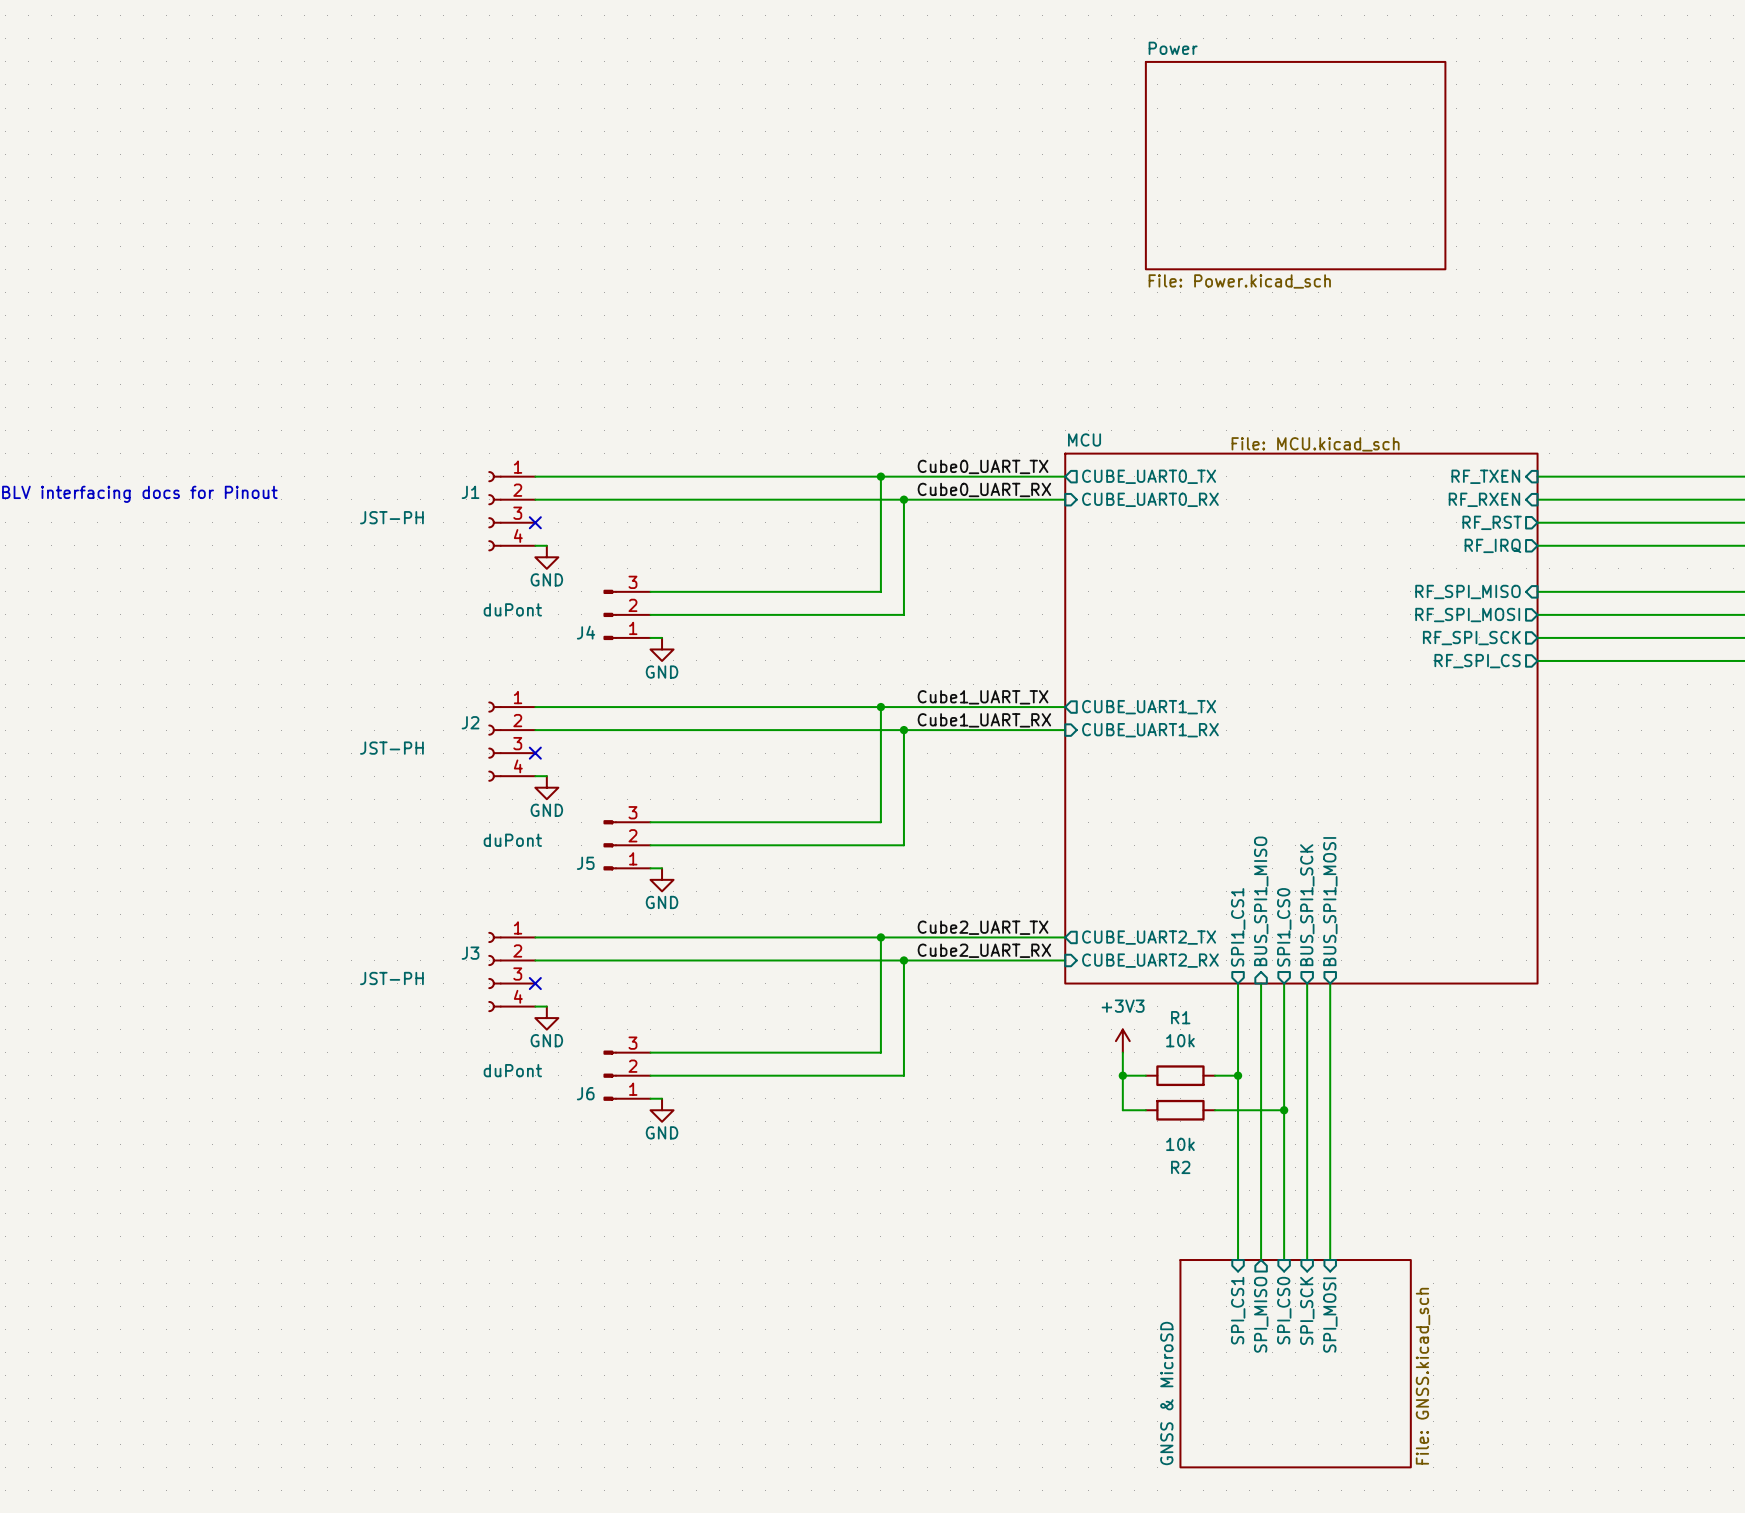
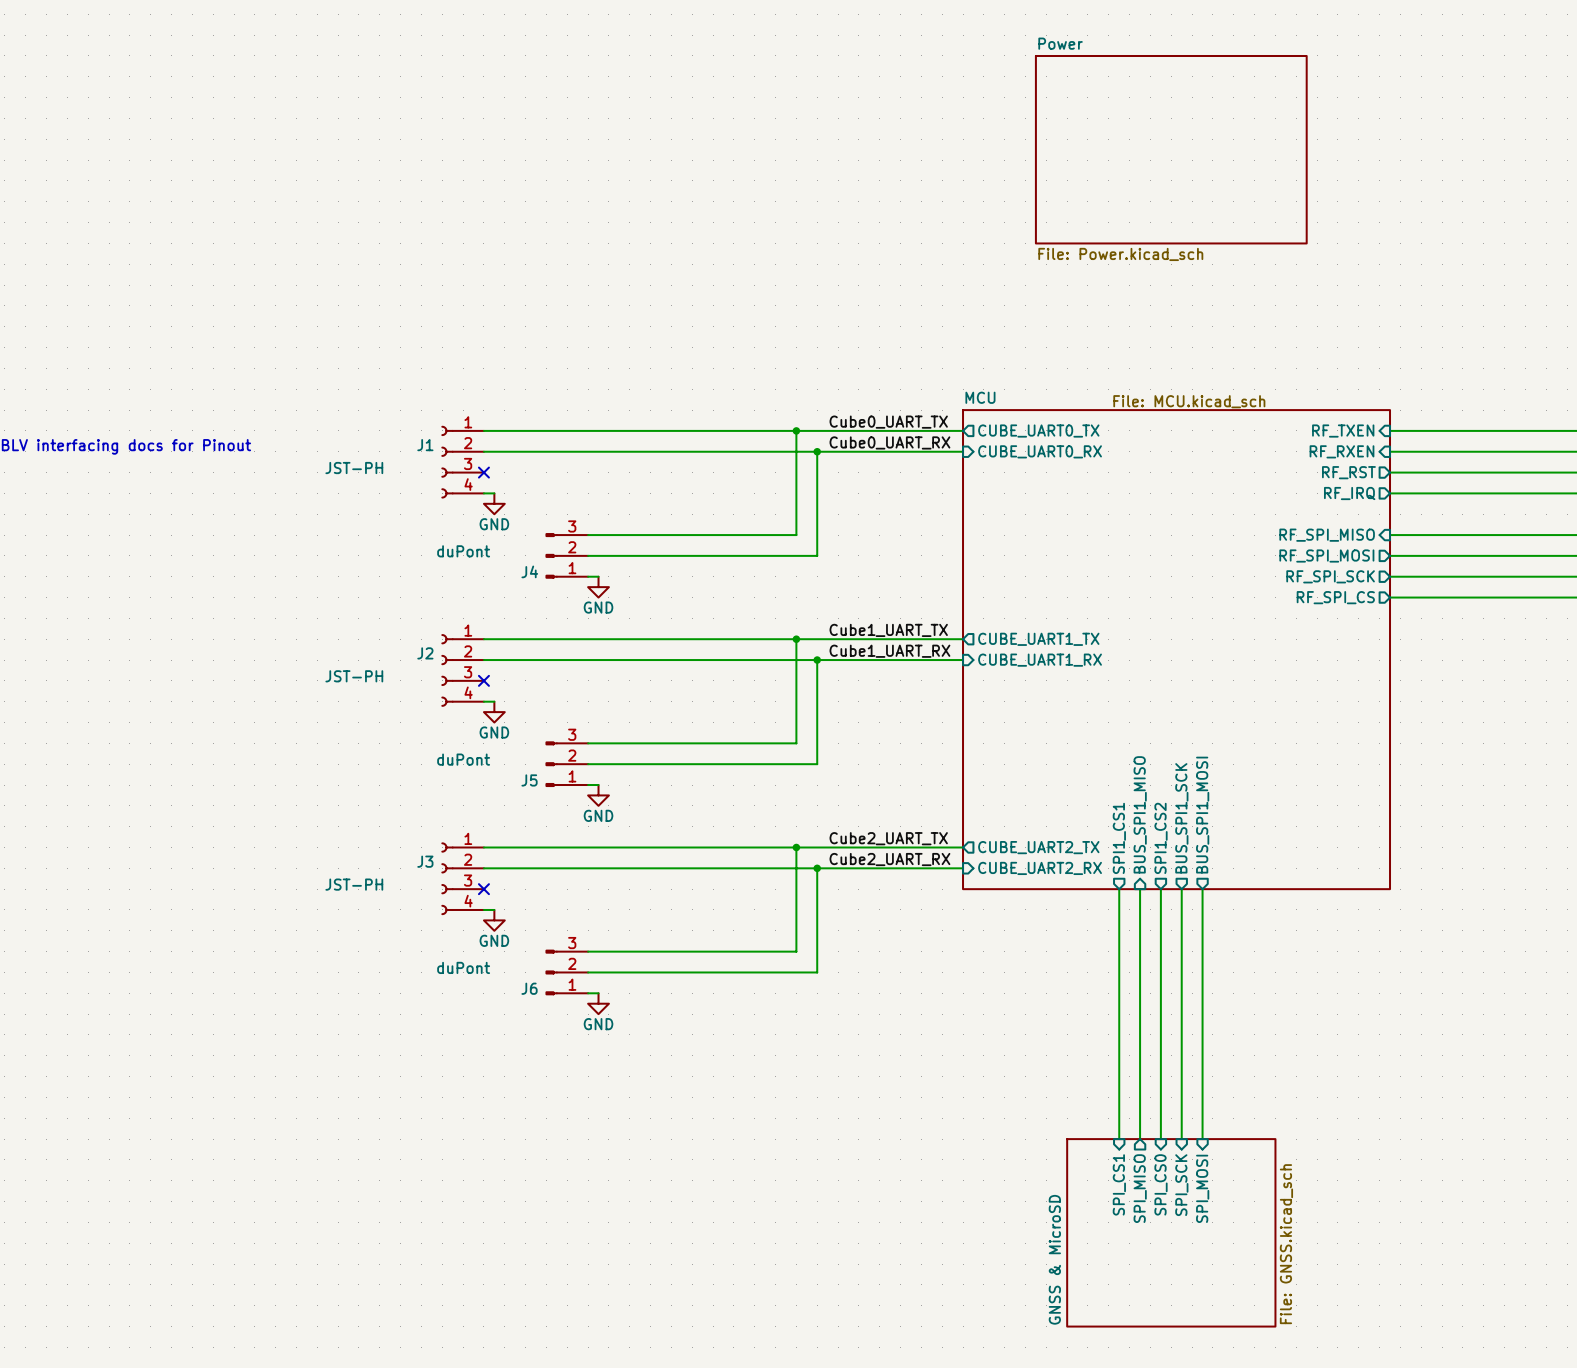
sheet pin: SPI1_CS0 (1284, 927) -> SPI1_CS2 (1161, 838)
power symbol: +3V3 (1122, 1041) -> none
wire: (1122, 1052) (1122, 1110) (1145, 1110) -> none
wire: (1122, 1075) (1145, 1075) -> none
junction: (1122, 1075) -> none
R1: 10k (1180, 1075) -> none
wire: (1215, 1075) (1238, 1075) -> none
junction: (1238, 1075) -> none
R2: 10k (1180, 1110) -> none
wire: (1215, 1110) (1284, 1110) -> none
junction: (1284, 1110) -> none

